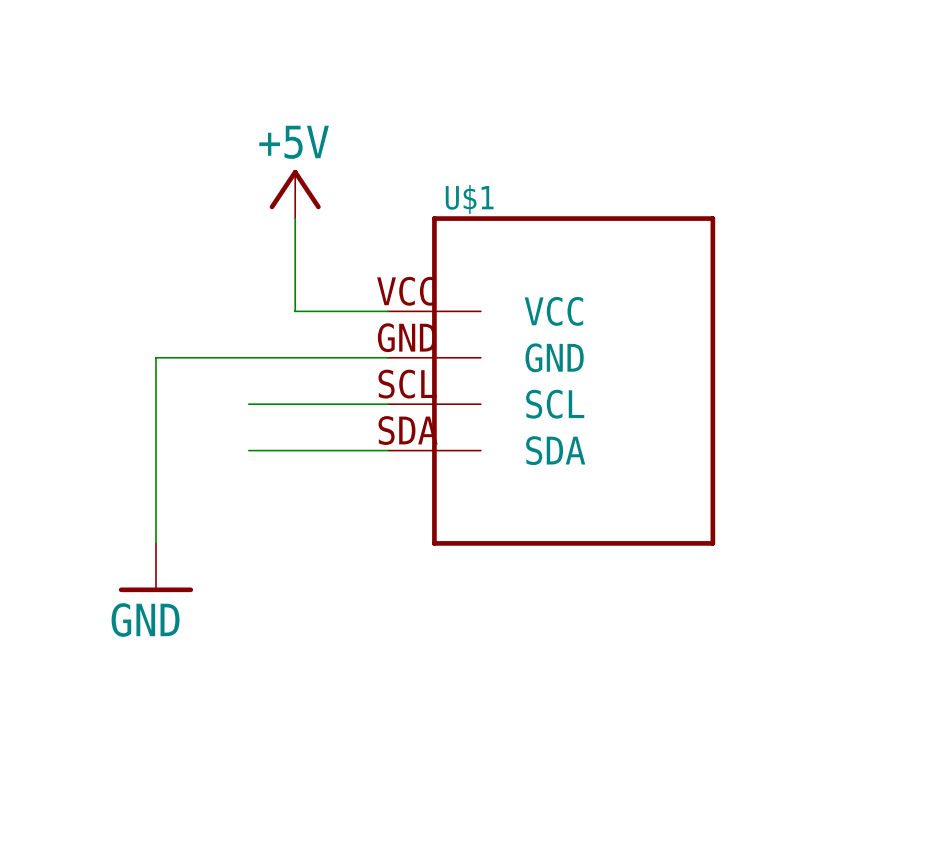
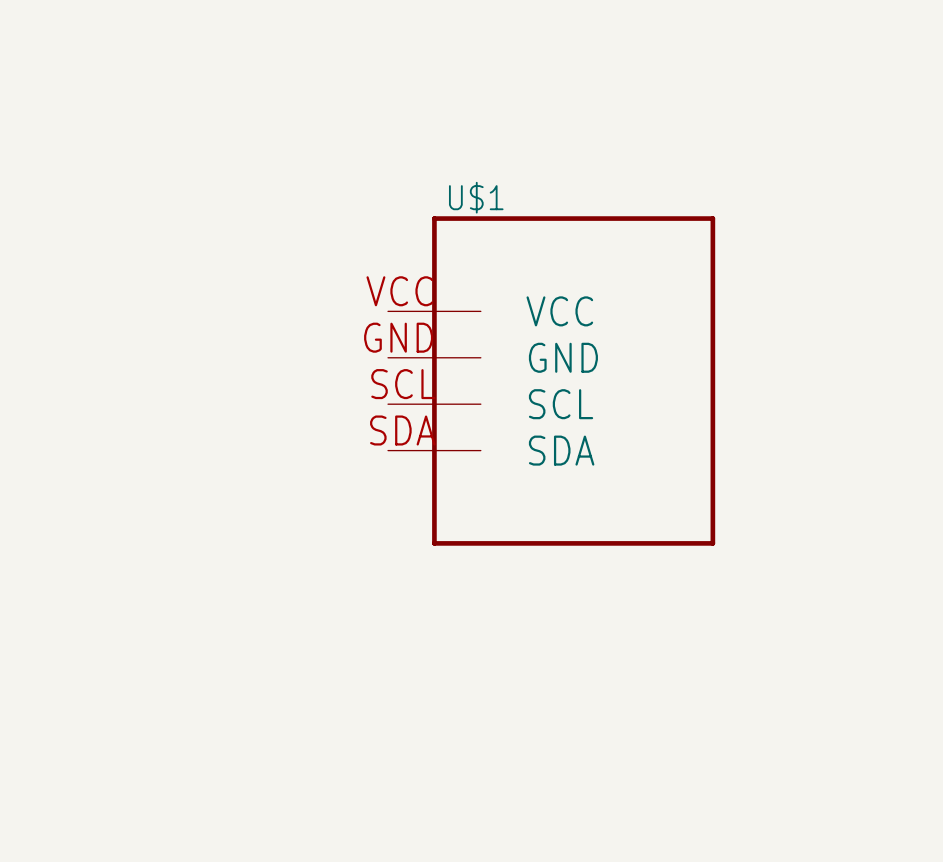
power symbol: +5V (295, 194) -> none
wire: (295, 218) (295, 311) (388, 311) -> none
wire: (388, 357) (155, 357) (155, 543) -> none
wire: (248, 404) (388, 404) -> none
wire: (248, 450) (388, 450) -> none
power symbol: GND (155, 567) -> none

